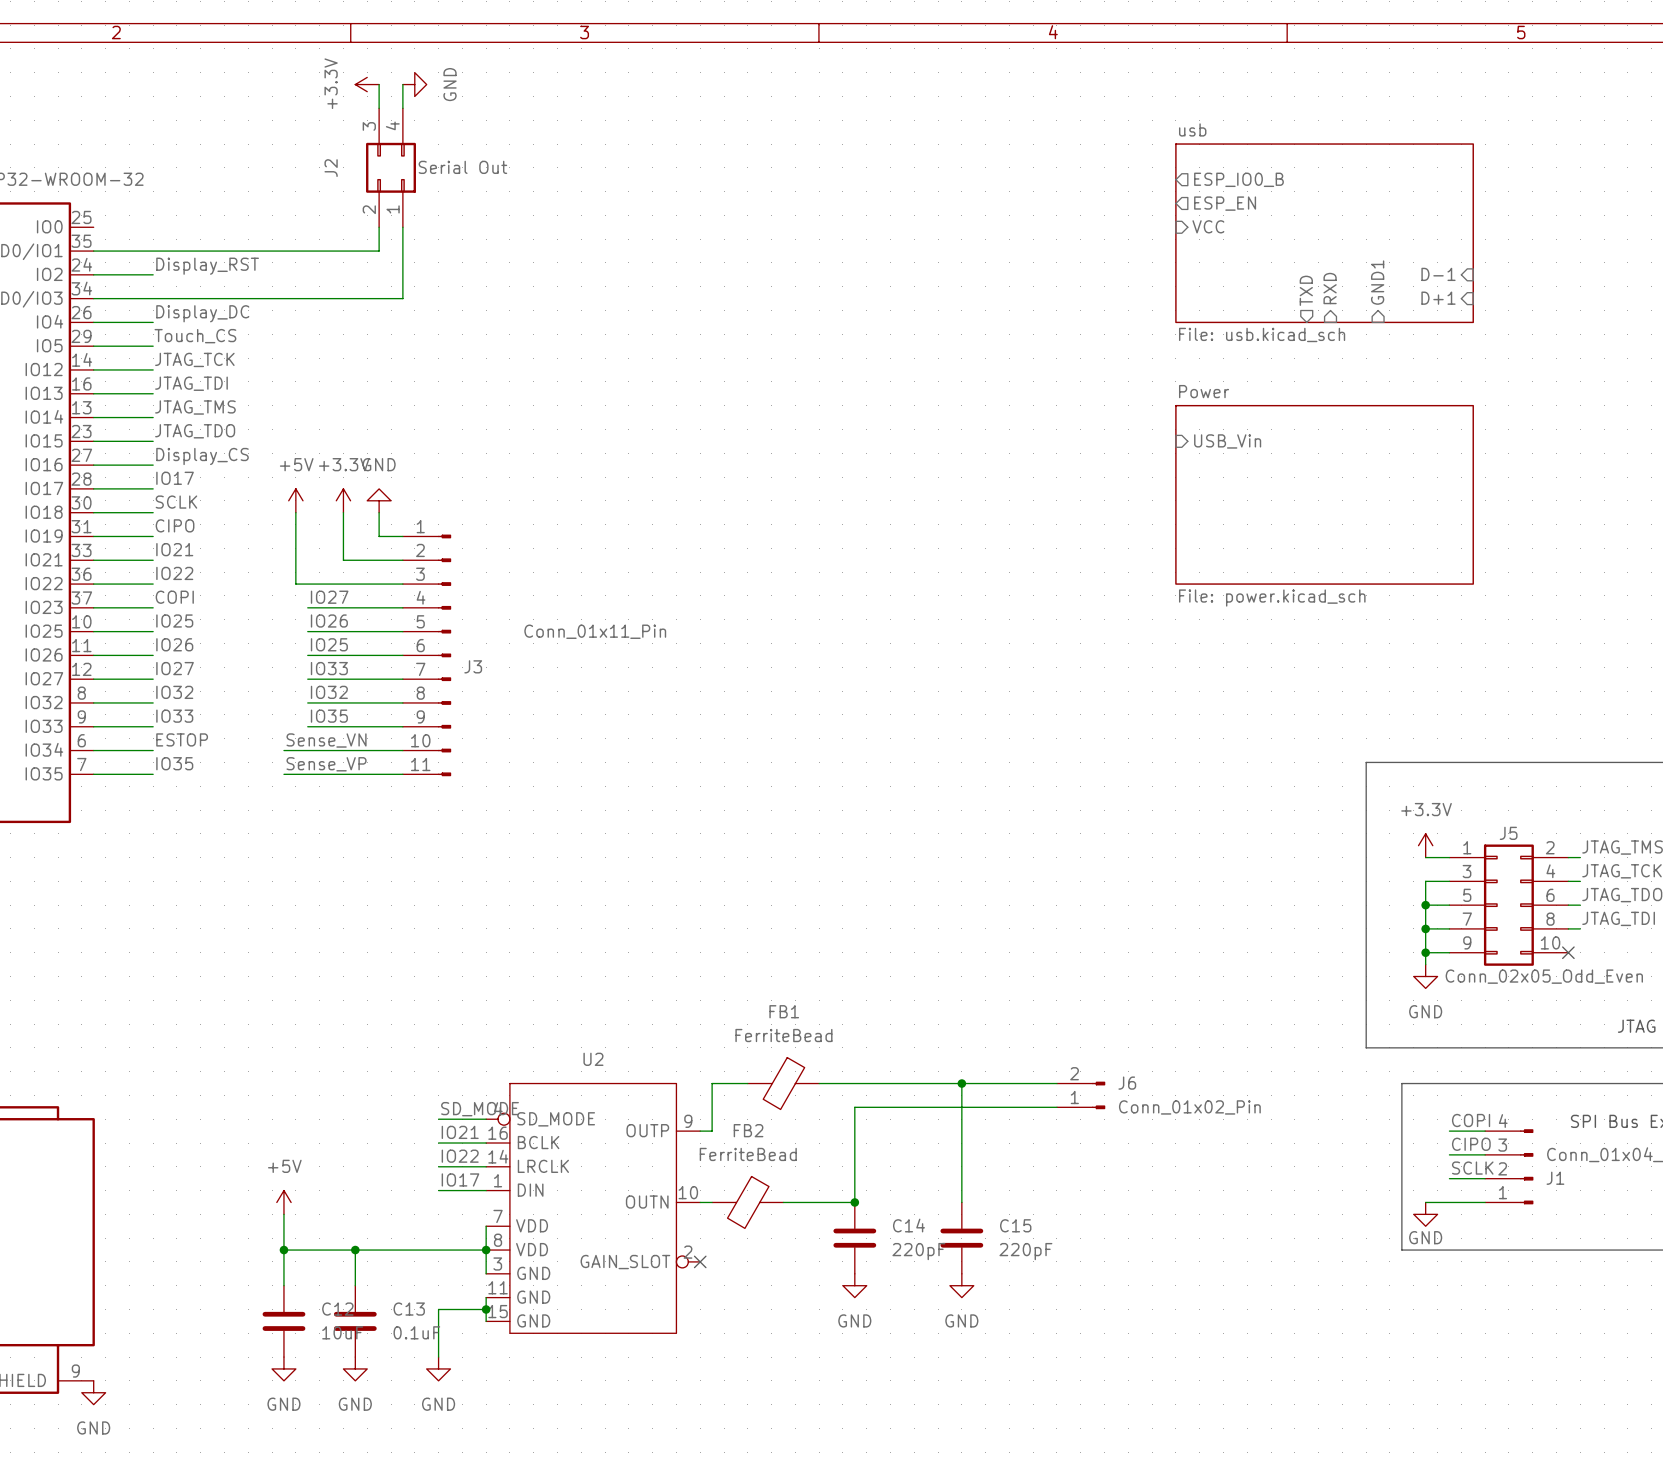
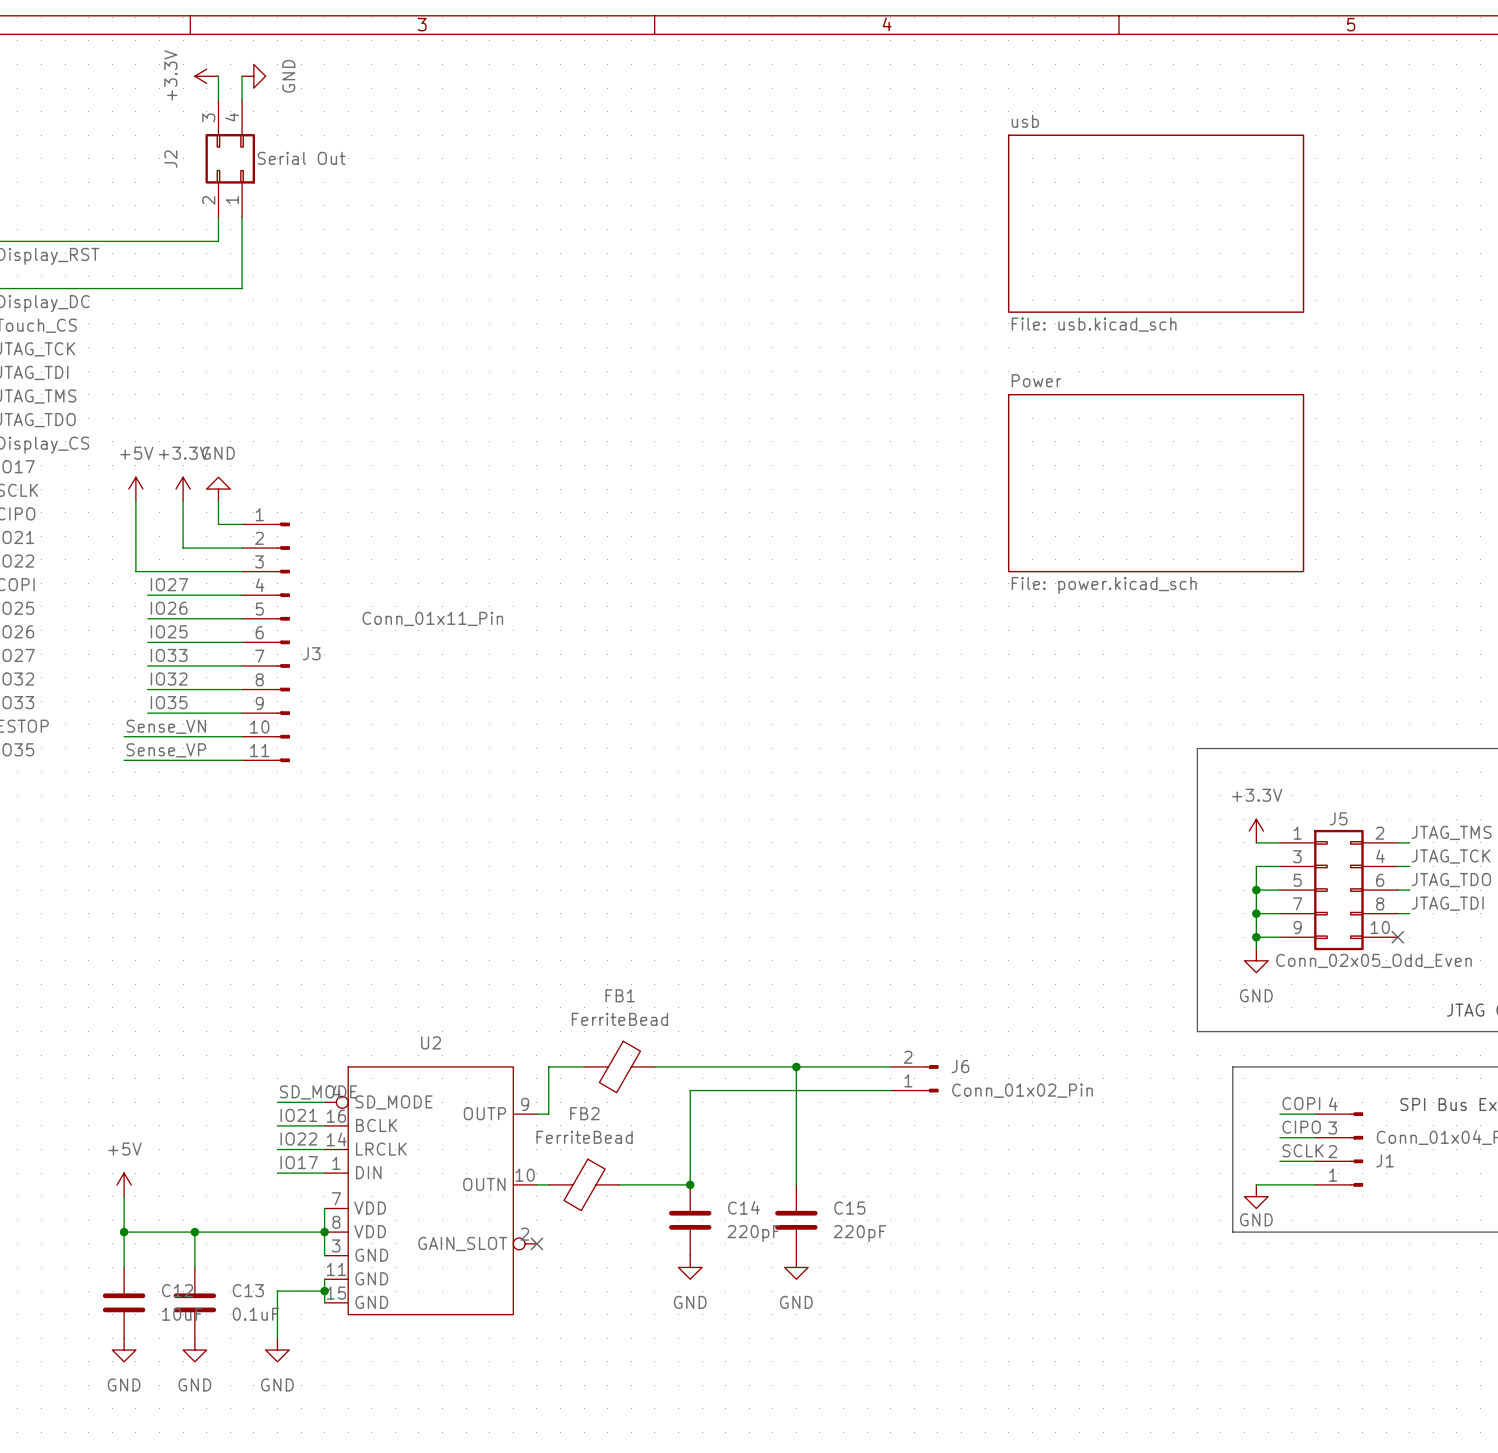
sheet pin: ESP_IO0_B (1238, 179) -> none
sheet pin: ESP_EN (1225, 203) -> none
sheet pin: VCC (1208, 226) -> none
sheet pin: D-1 (1438, 274) -> none
sheet pin: GND1 (1377, 282) -> none
sheet pin: RXD (1330, 288) -> none
sheet pin: TXD (1306, 290) -> none
sheet pin: D+1 (1438, 298) -> none
sheet pin: USB_Vin (1227, 441) -> none

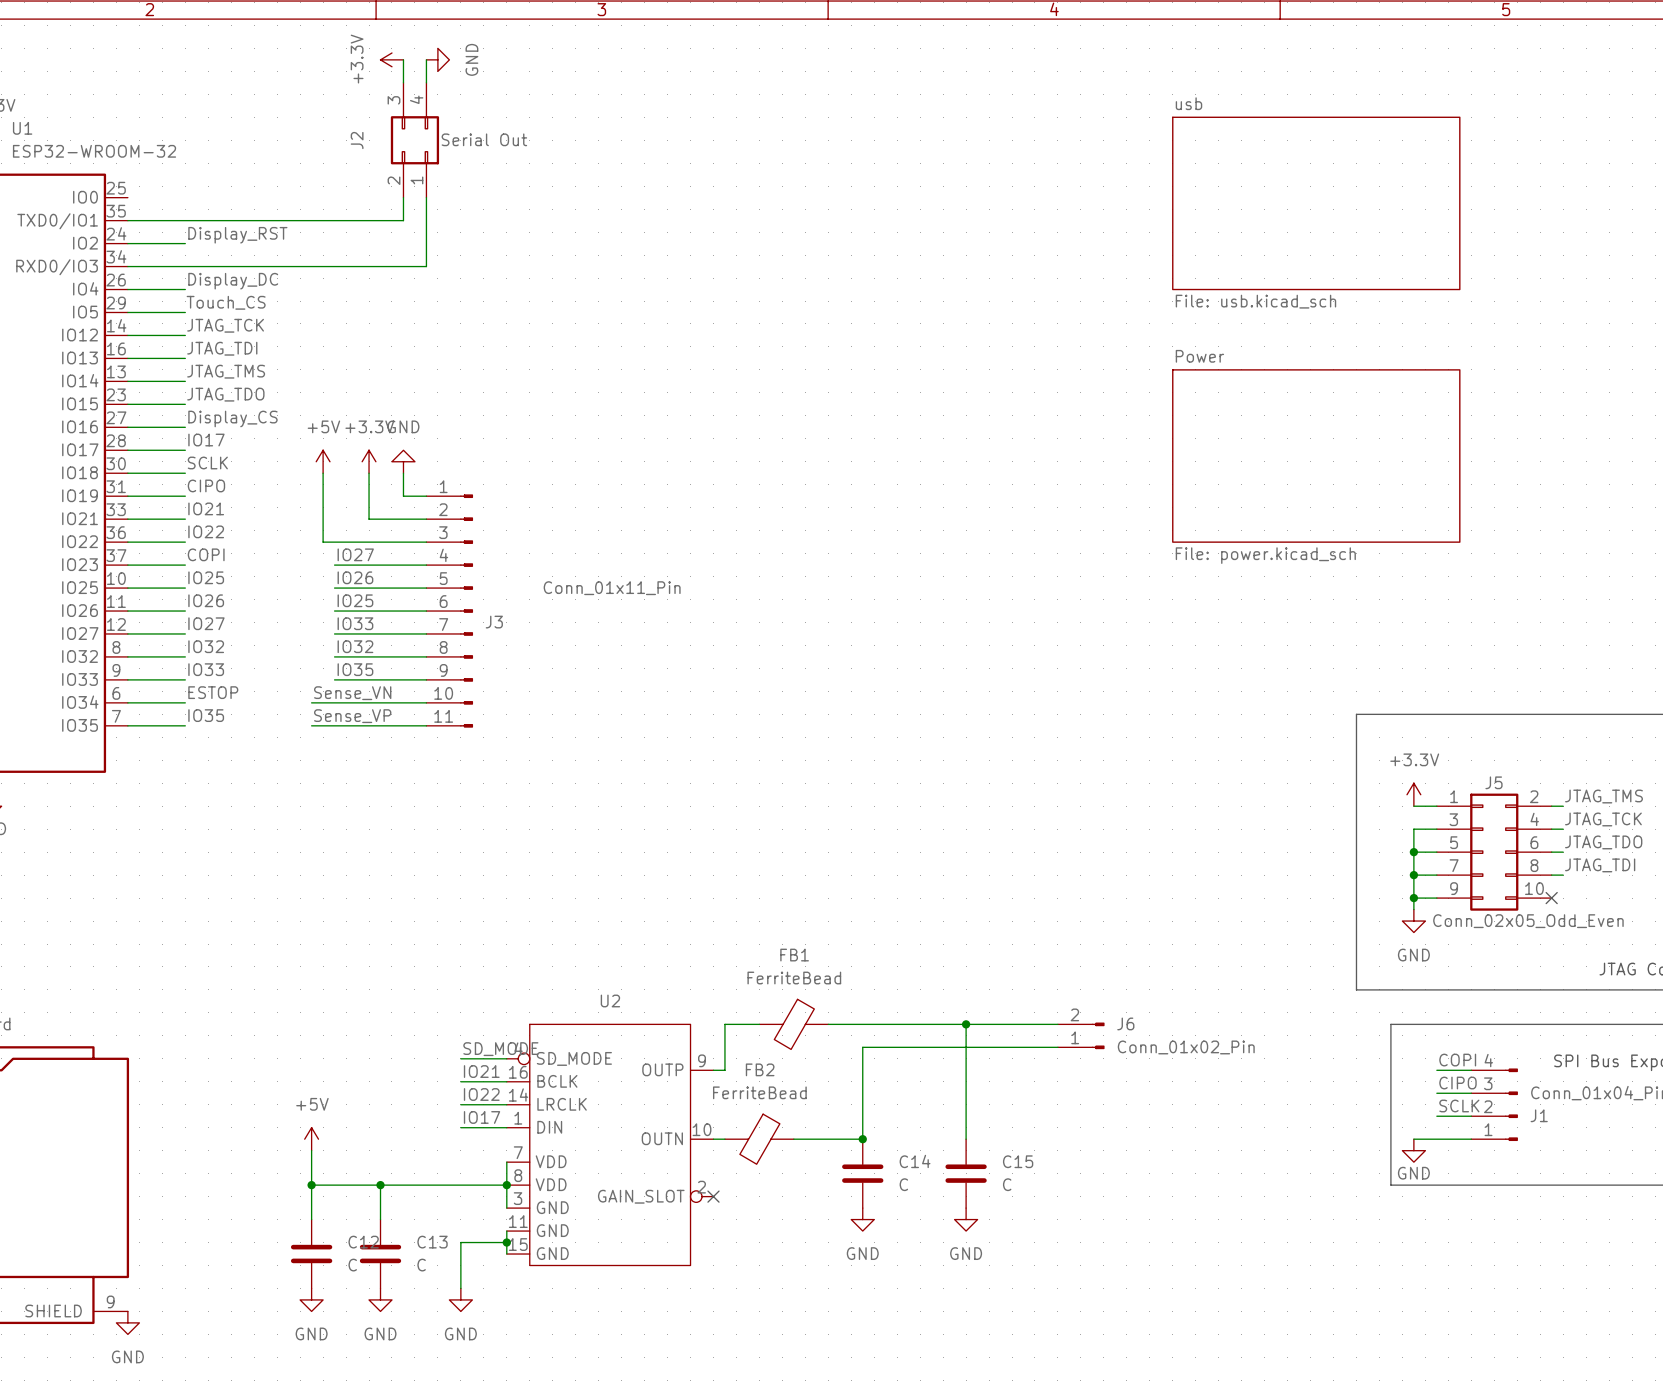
C14 value: 220pF (753, 1233) -> C (903, 1184)
C15 value: 220pF (859, 1233) -> C (1007, 1184)
C12 value: 10uF (182, 1314) -> C (352, 1265)
C13 value: 0.1uF (255, 1314) -> C (421, 1265)

